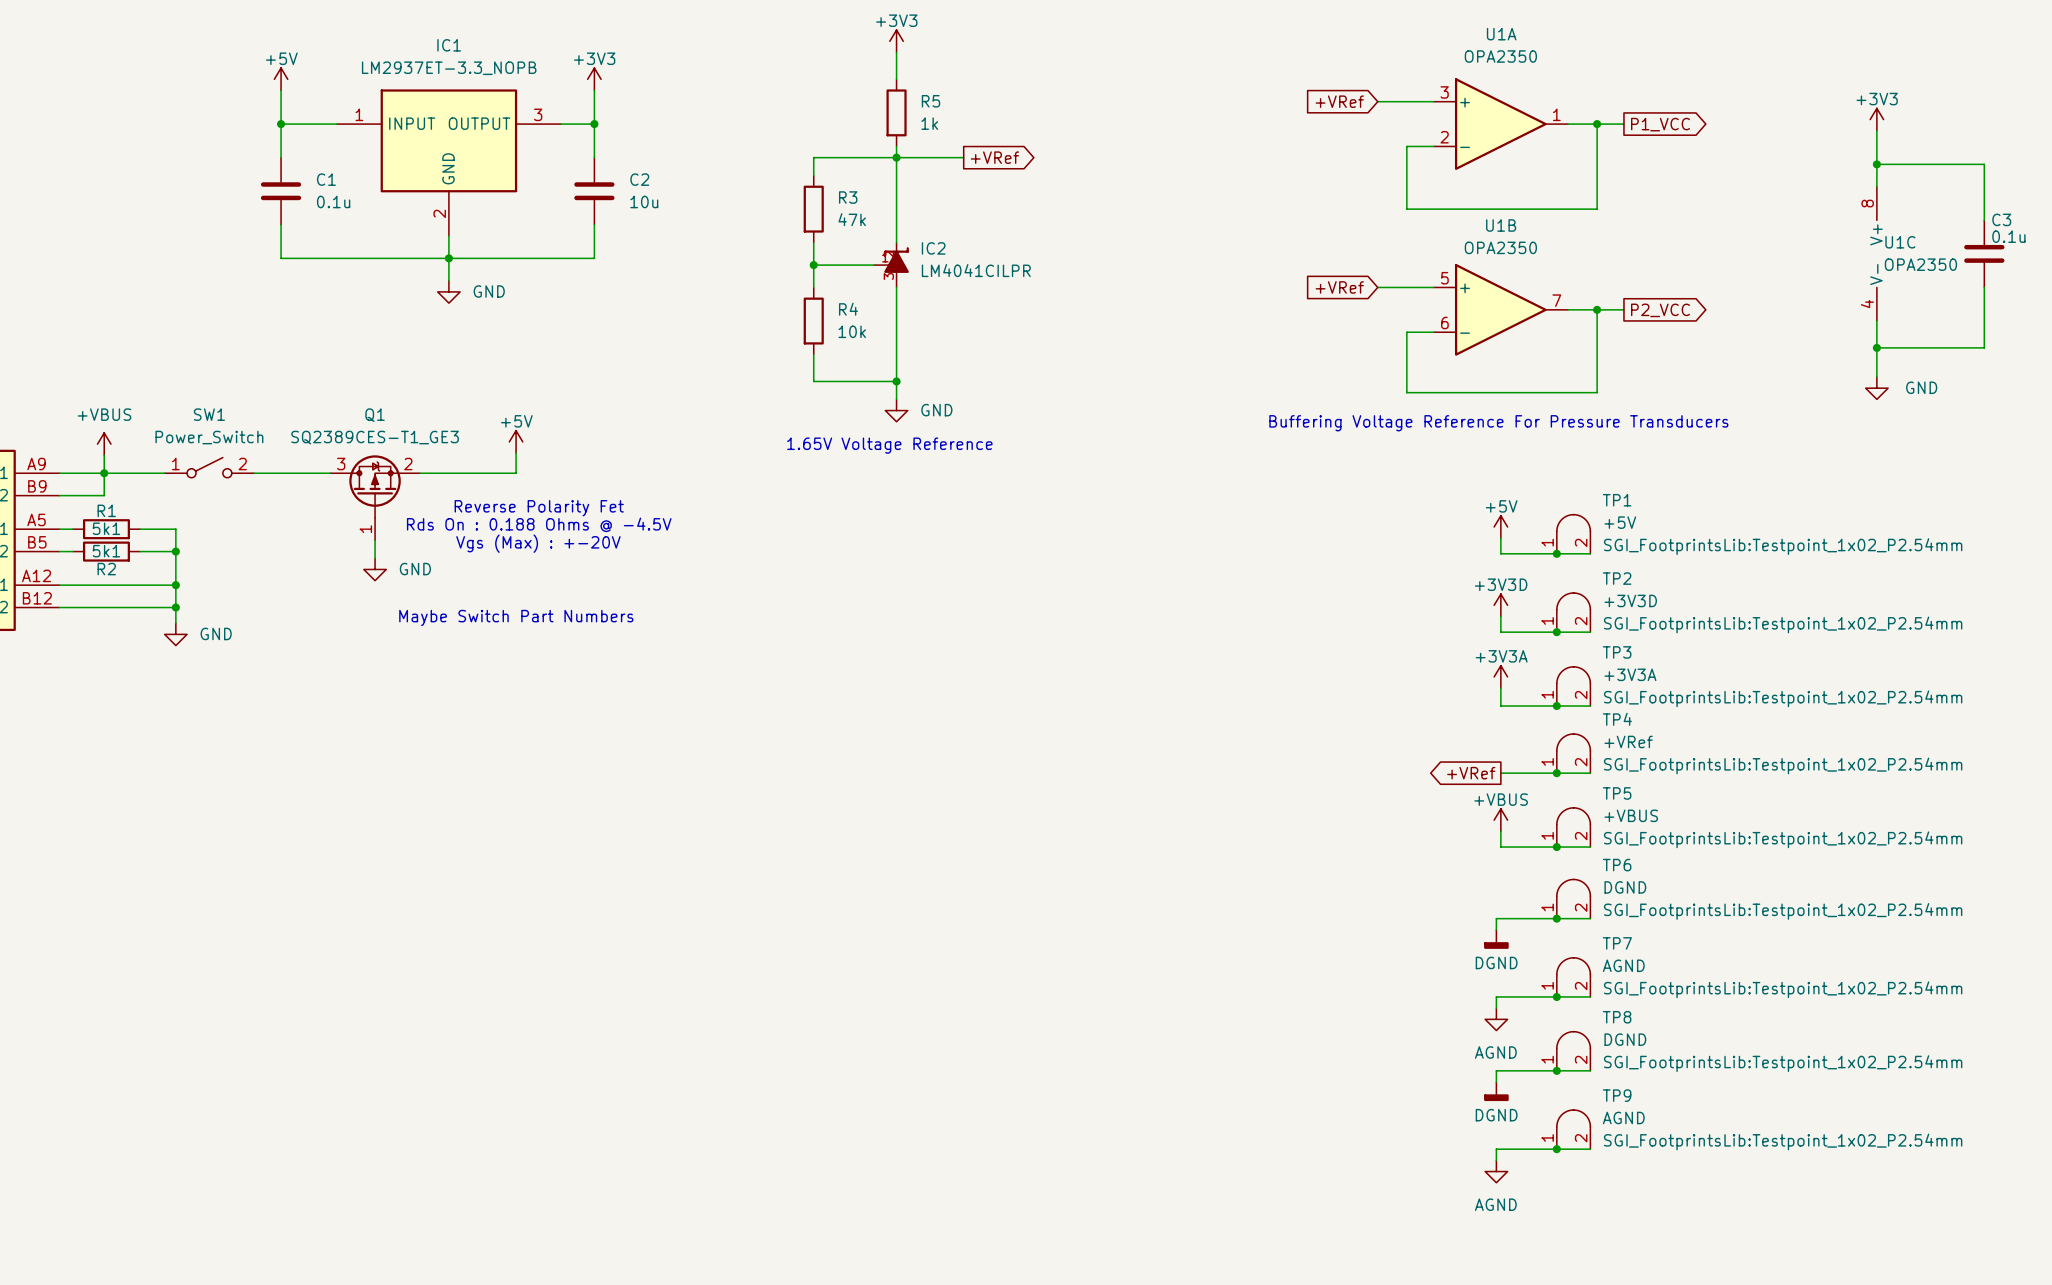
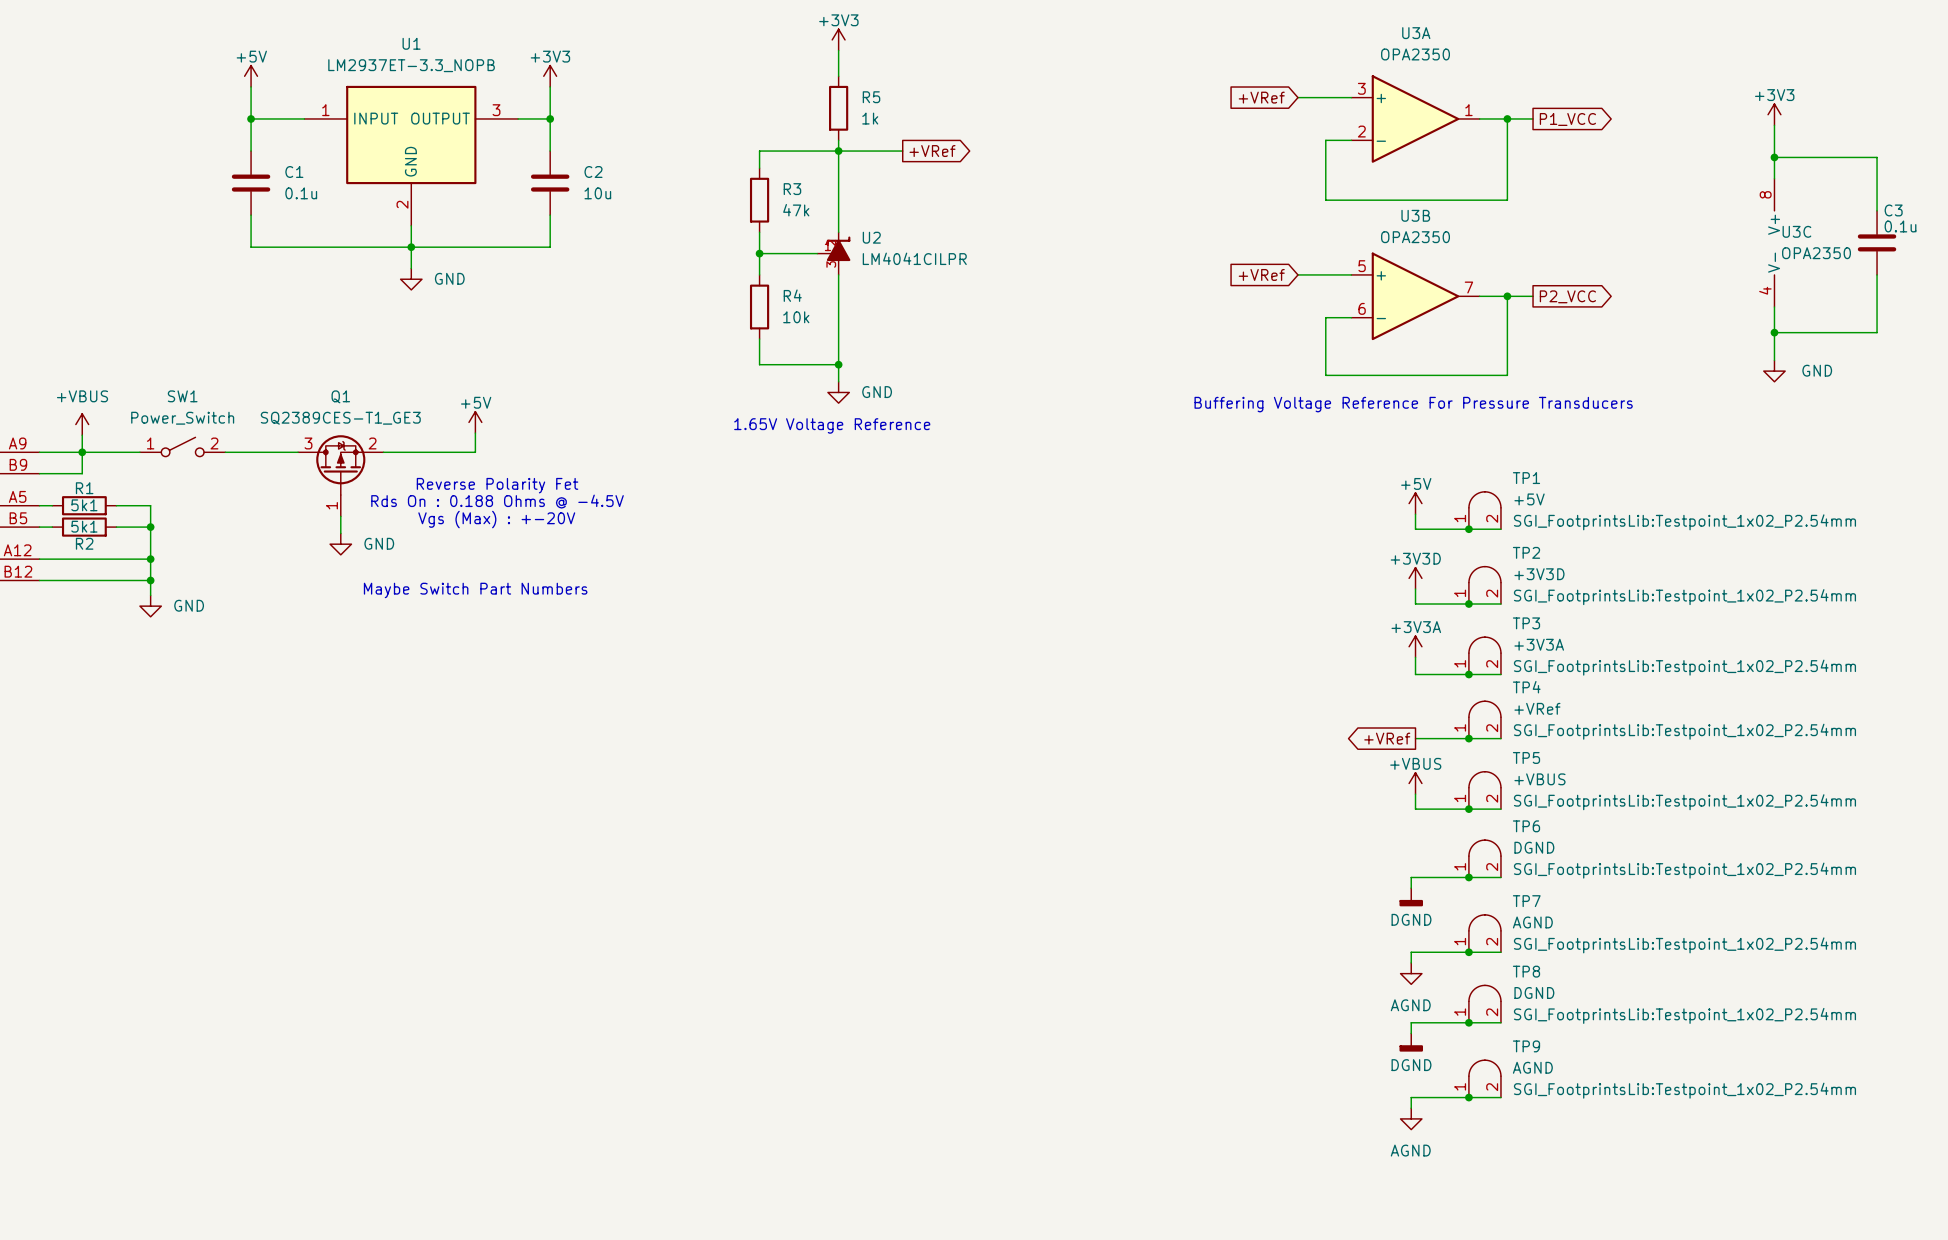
U1A name: U1A (1501, 34) -> U3A (1416, 33)
IC1 name: IC1 (449, 45) -> U1 (411, 43)
U1B name: U1B (1501, 225) -> U3B (1415, 215)
U1C name: U1C (1900, 242) -> U3C (1796, 231)
IC2 name: IC2 (933, 248) -> U2 (871, 237)

